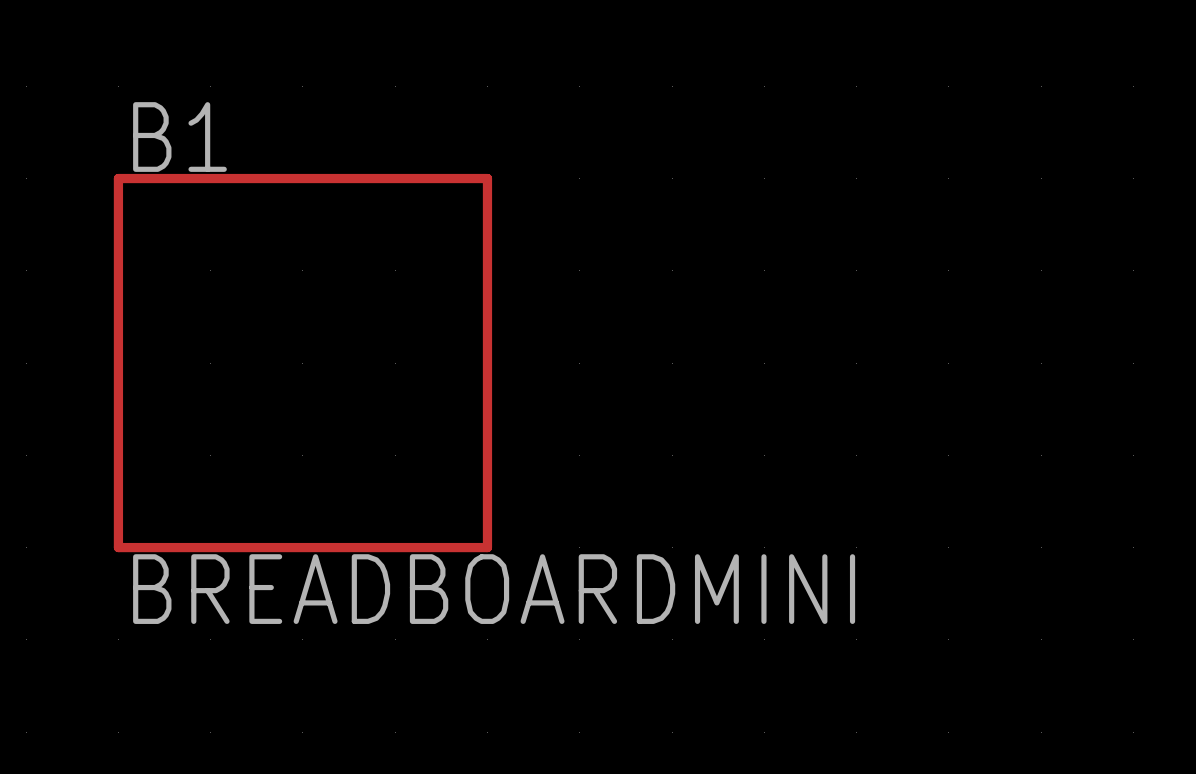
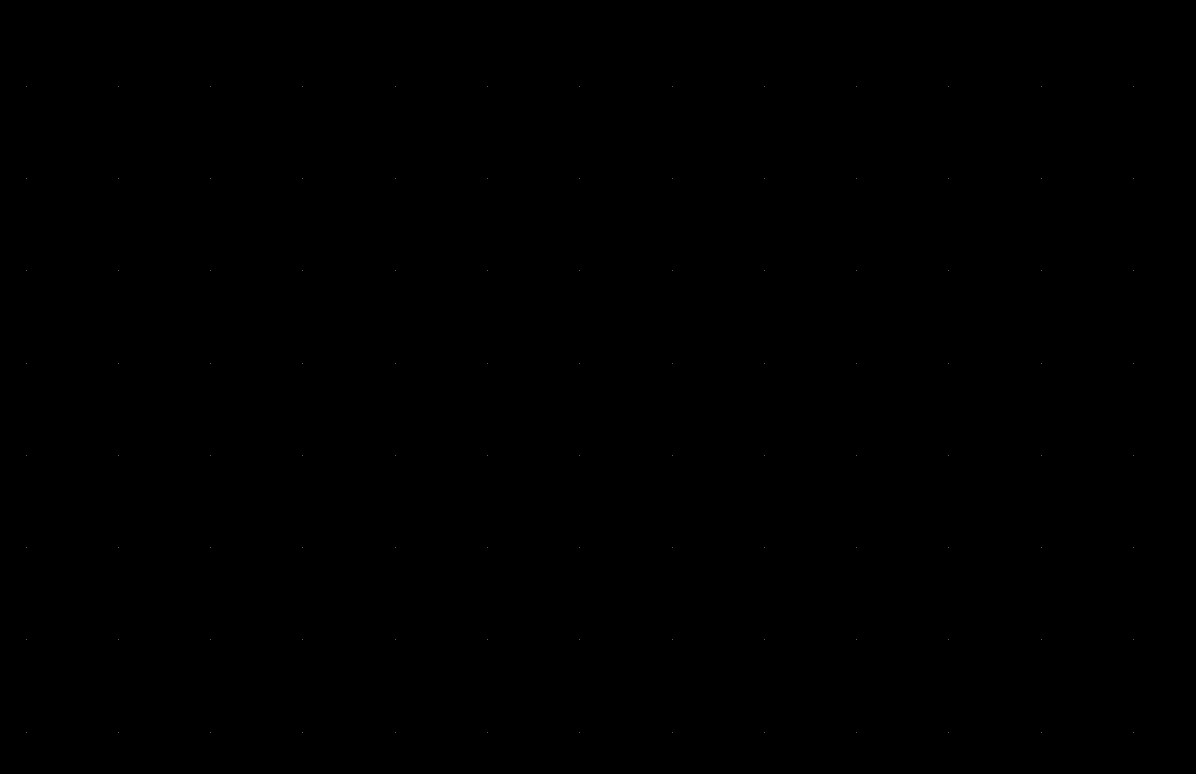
B1: BREADBOARDMINI (302, 363) -> none

